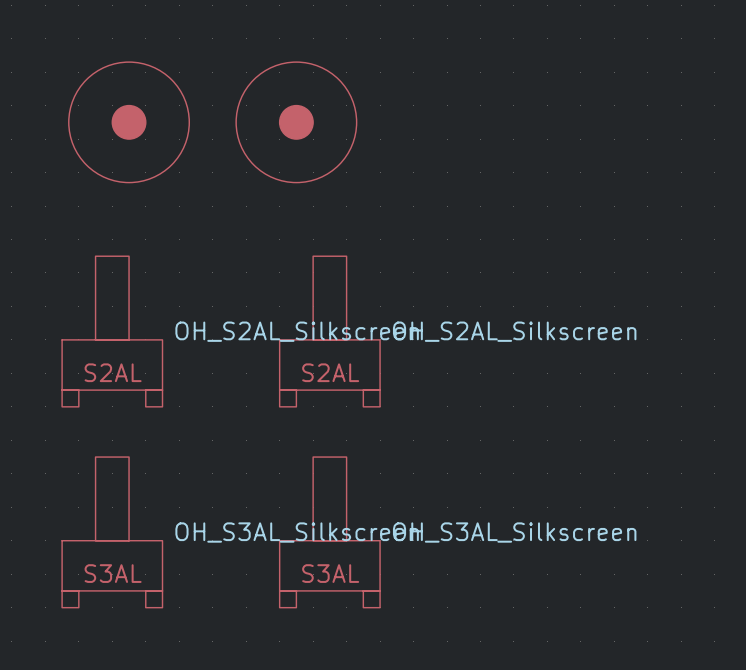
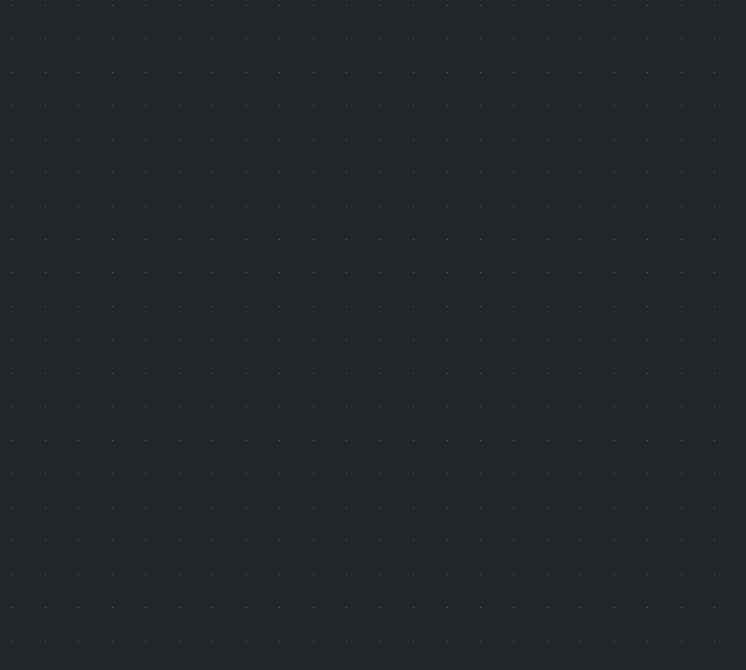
part: (129, 122) -> none
part: (296, 122) -> none
part: OH_S2AL_Silkscreen (112, 331) -> none
part: OH_S2AL_Silkscreen (329, 331) -> none
part: OH_S3AL_Silkscreen (112, 532) -> none
part: OH_S3AL_Silkscreen (329, 532) -> none

